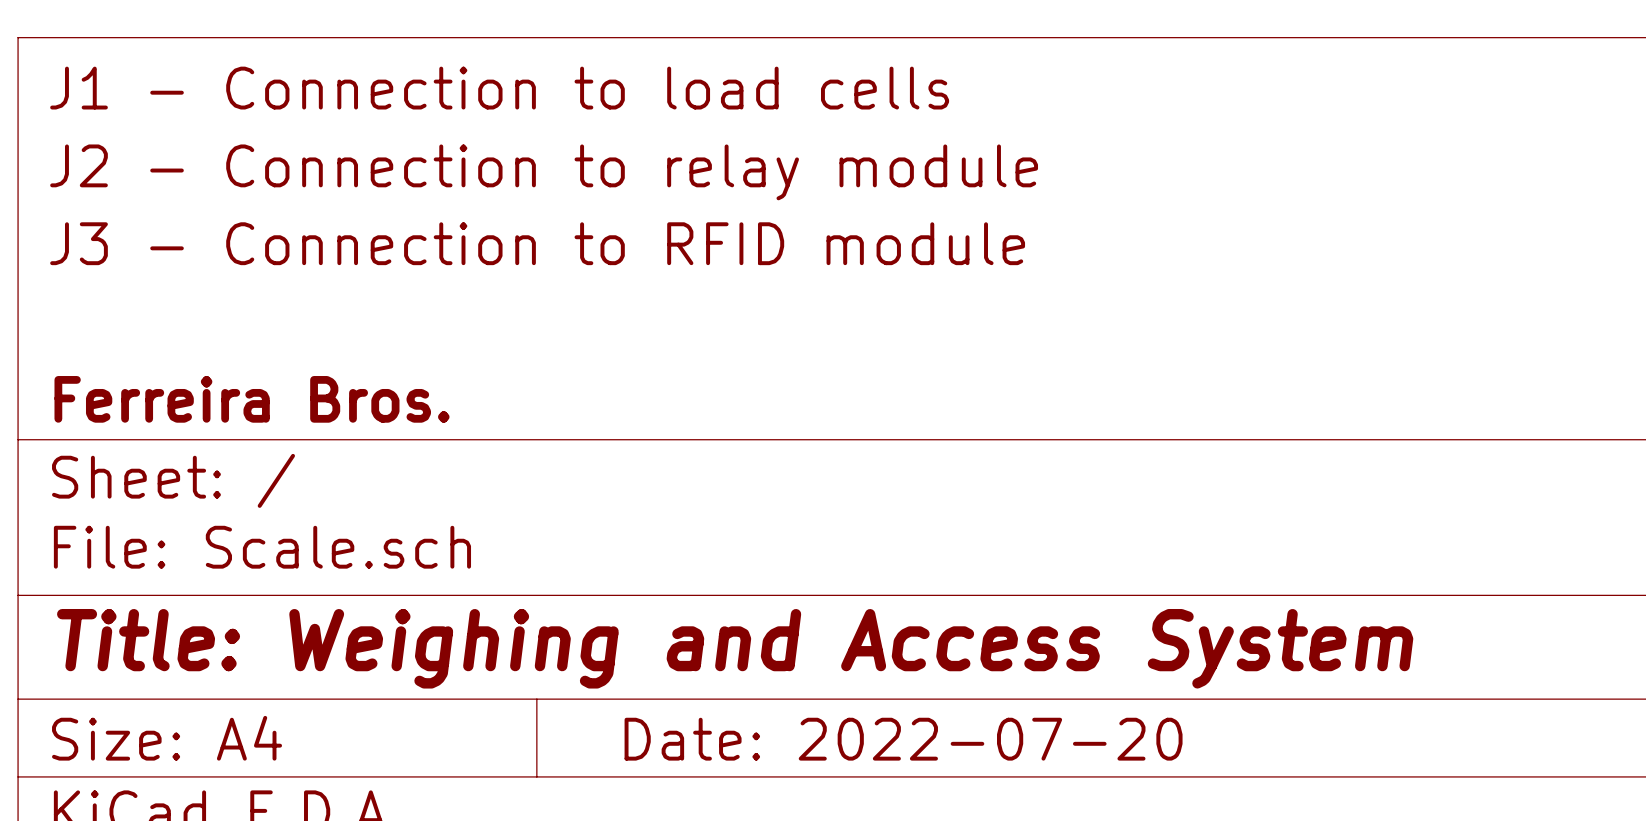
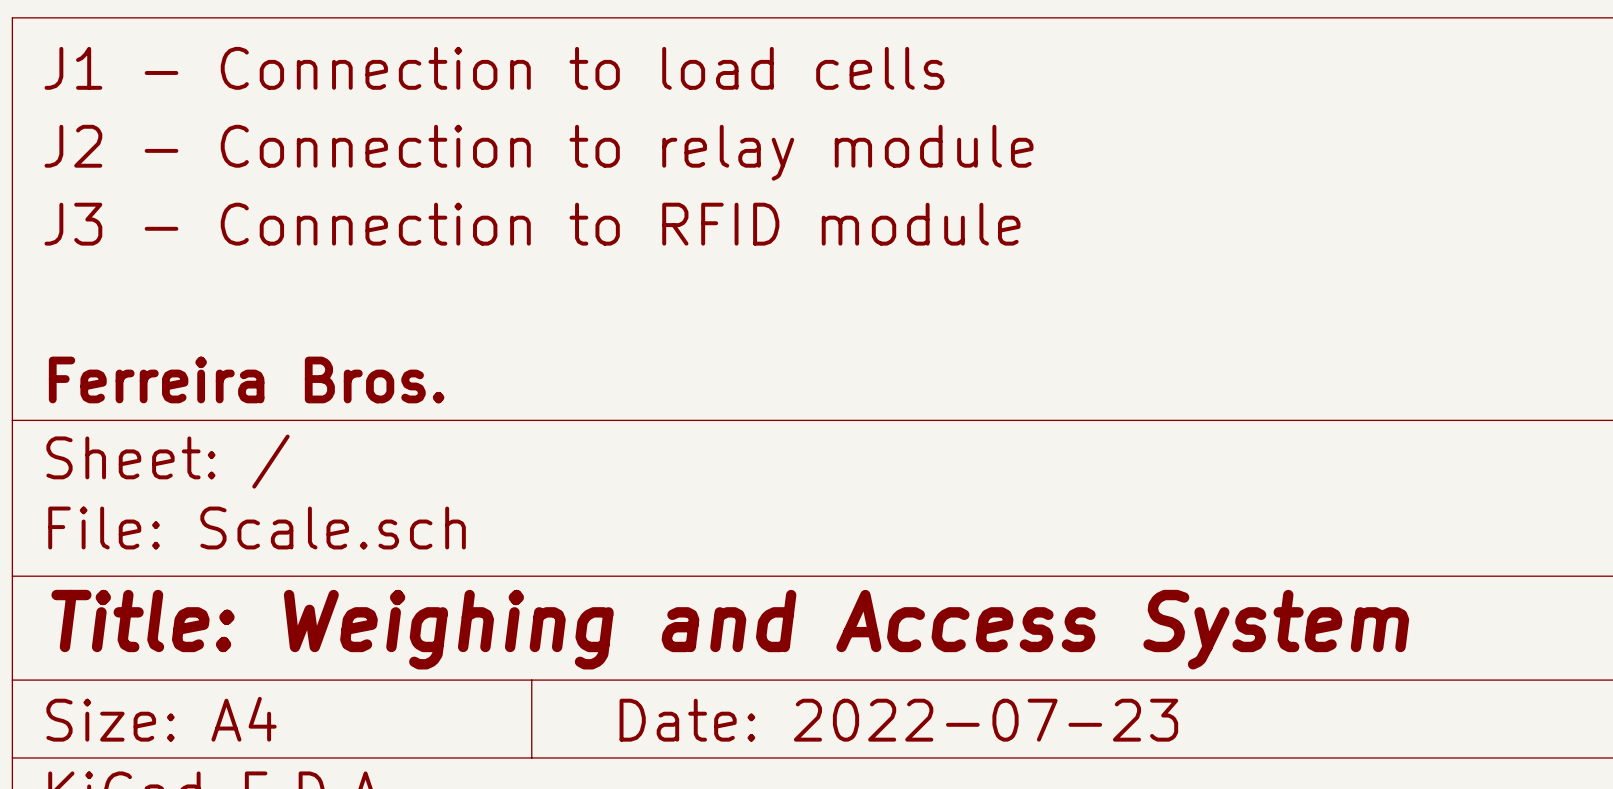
title block: Date: 2022-07-20 (903, 739) -> Date: 2022-07-23 (898, 720)

